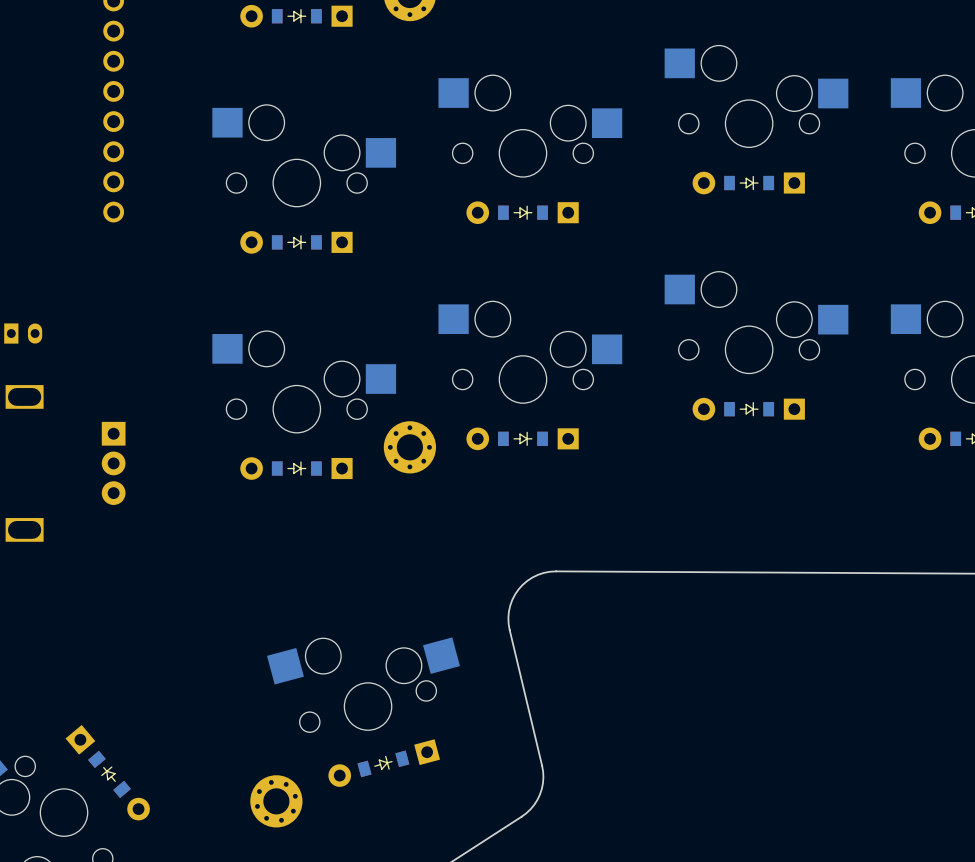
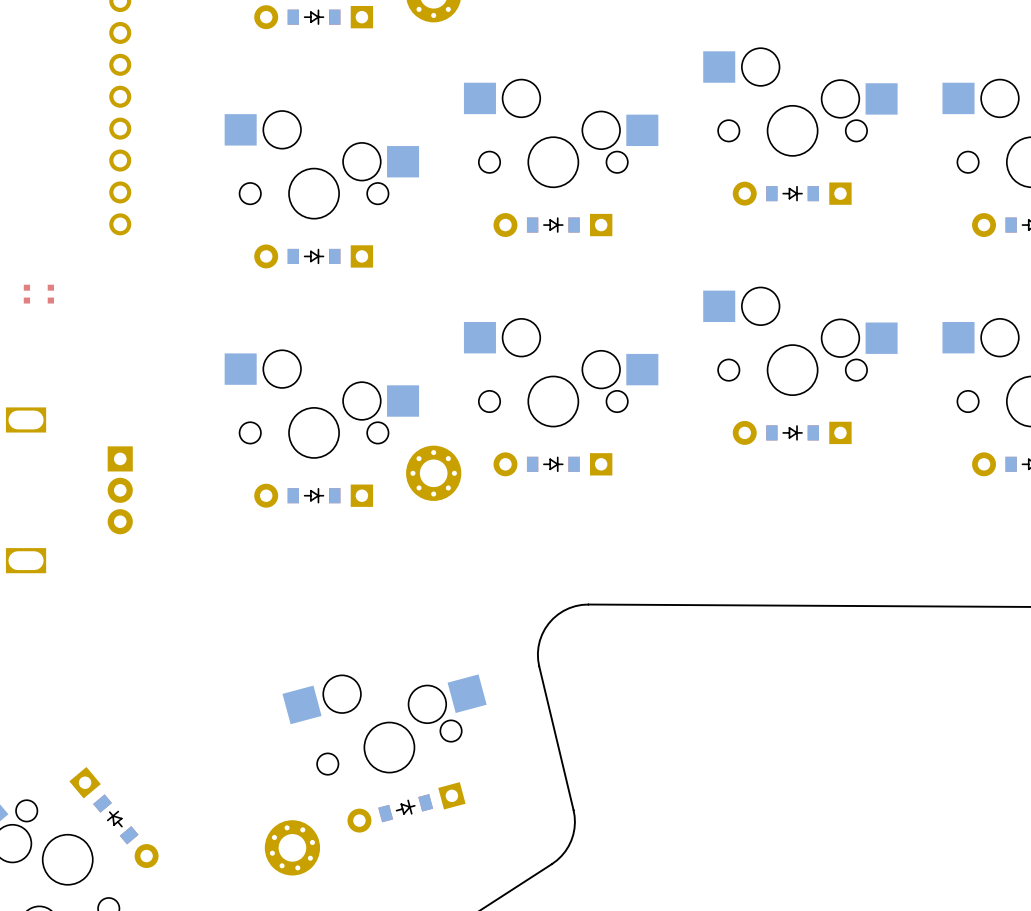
part: none -> (26, 294)
part: none -> (50, 294)
part: (23, 333) -> none

